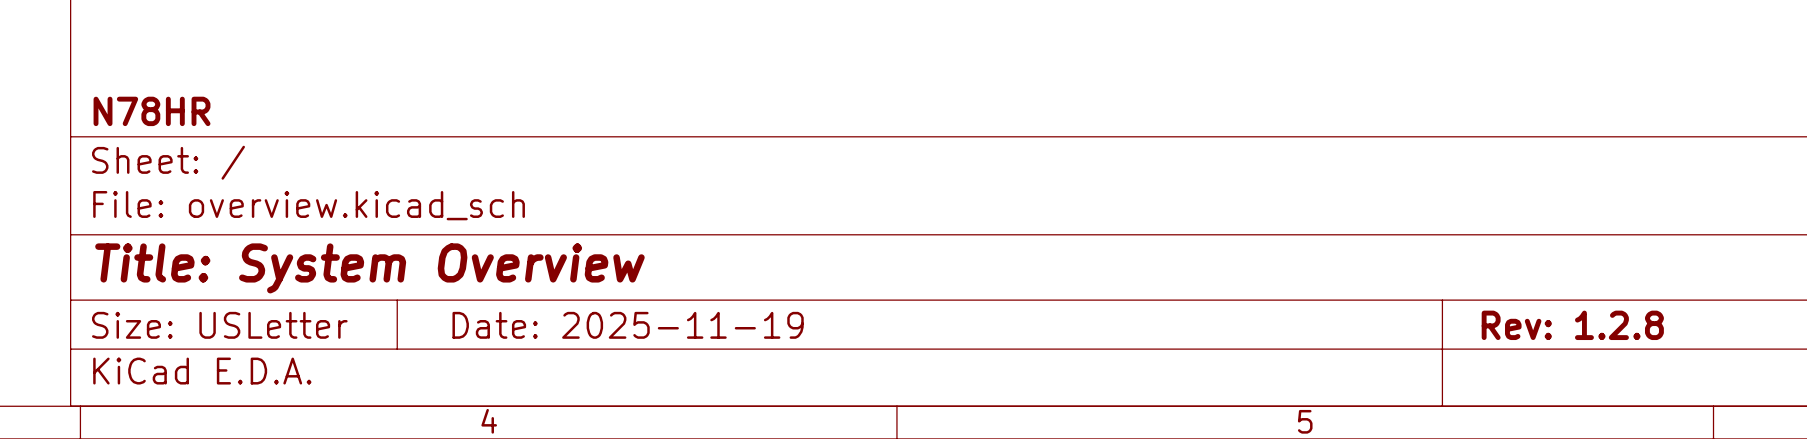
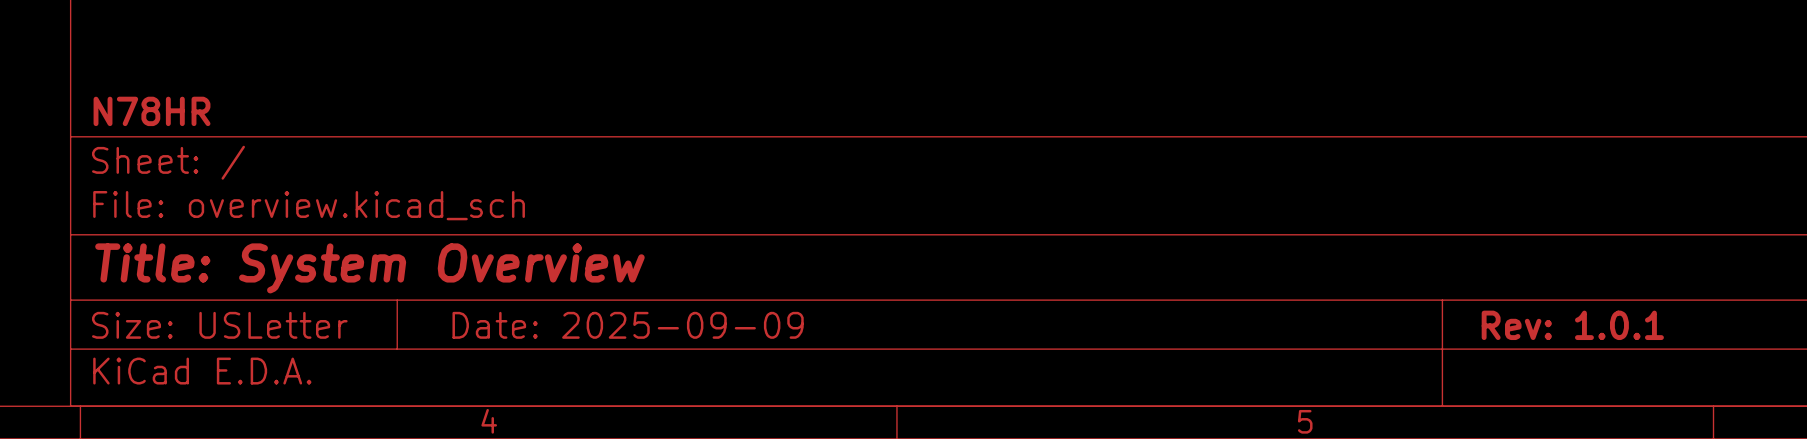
title block: Date: 2025-11-19 (628, 325) -> Date: 2025-09-09 (628, 325)
title block: Rev: 1.2.8 (1572, 325) -> Rev: 1.0.1 (1572, 325)

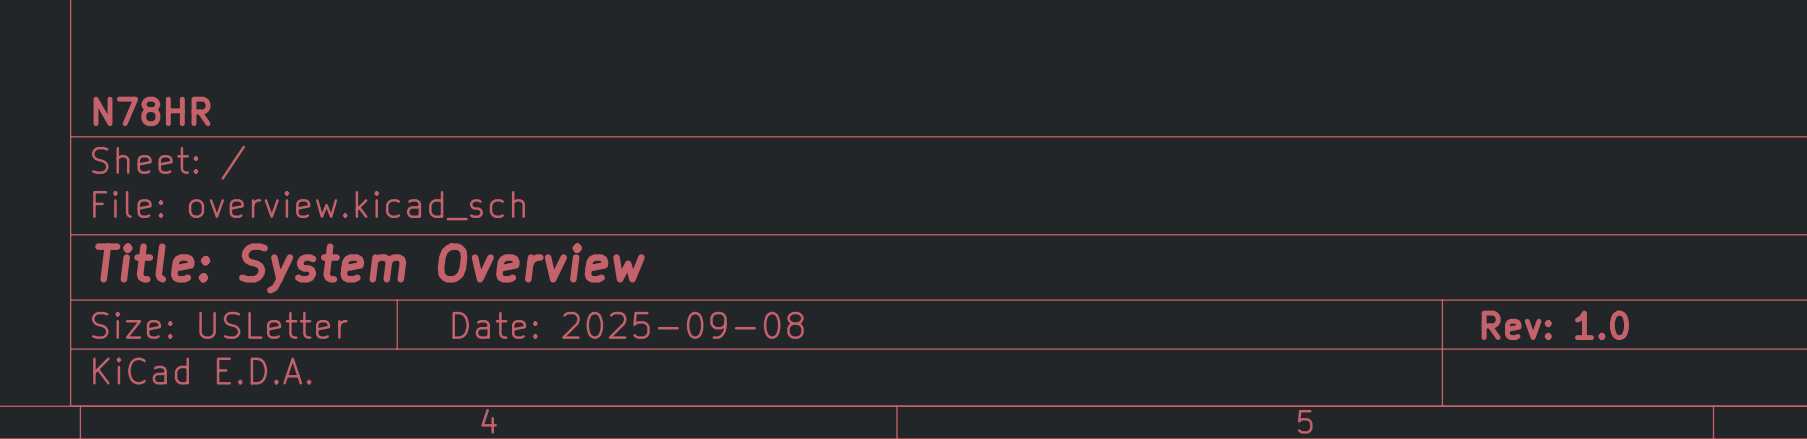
title block: Date: 2025-09-09 (628, 325) -> Date: 2025-09-08 (628, 325)
title block: Rev: 1.0.1 (1572, 325) -> Rev: 1.0 (1555, 325)

